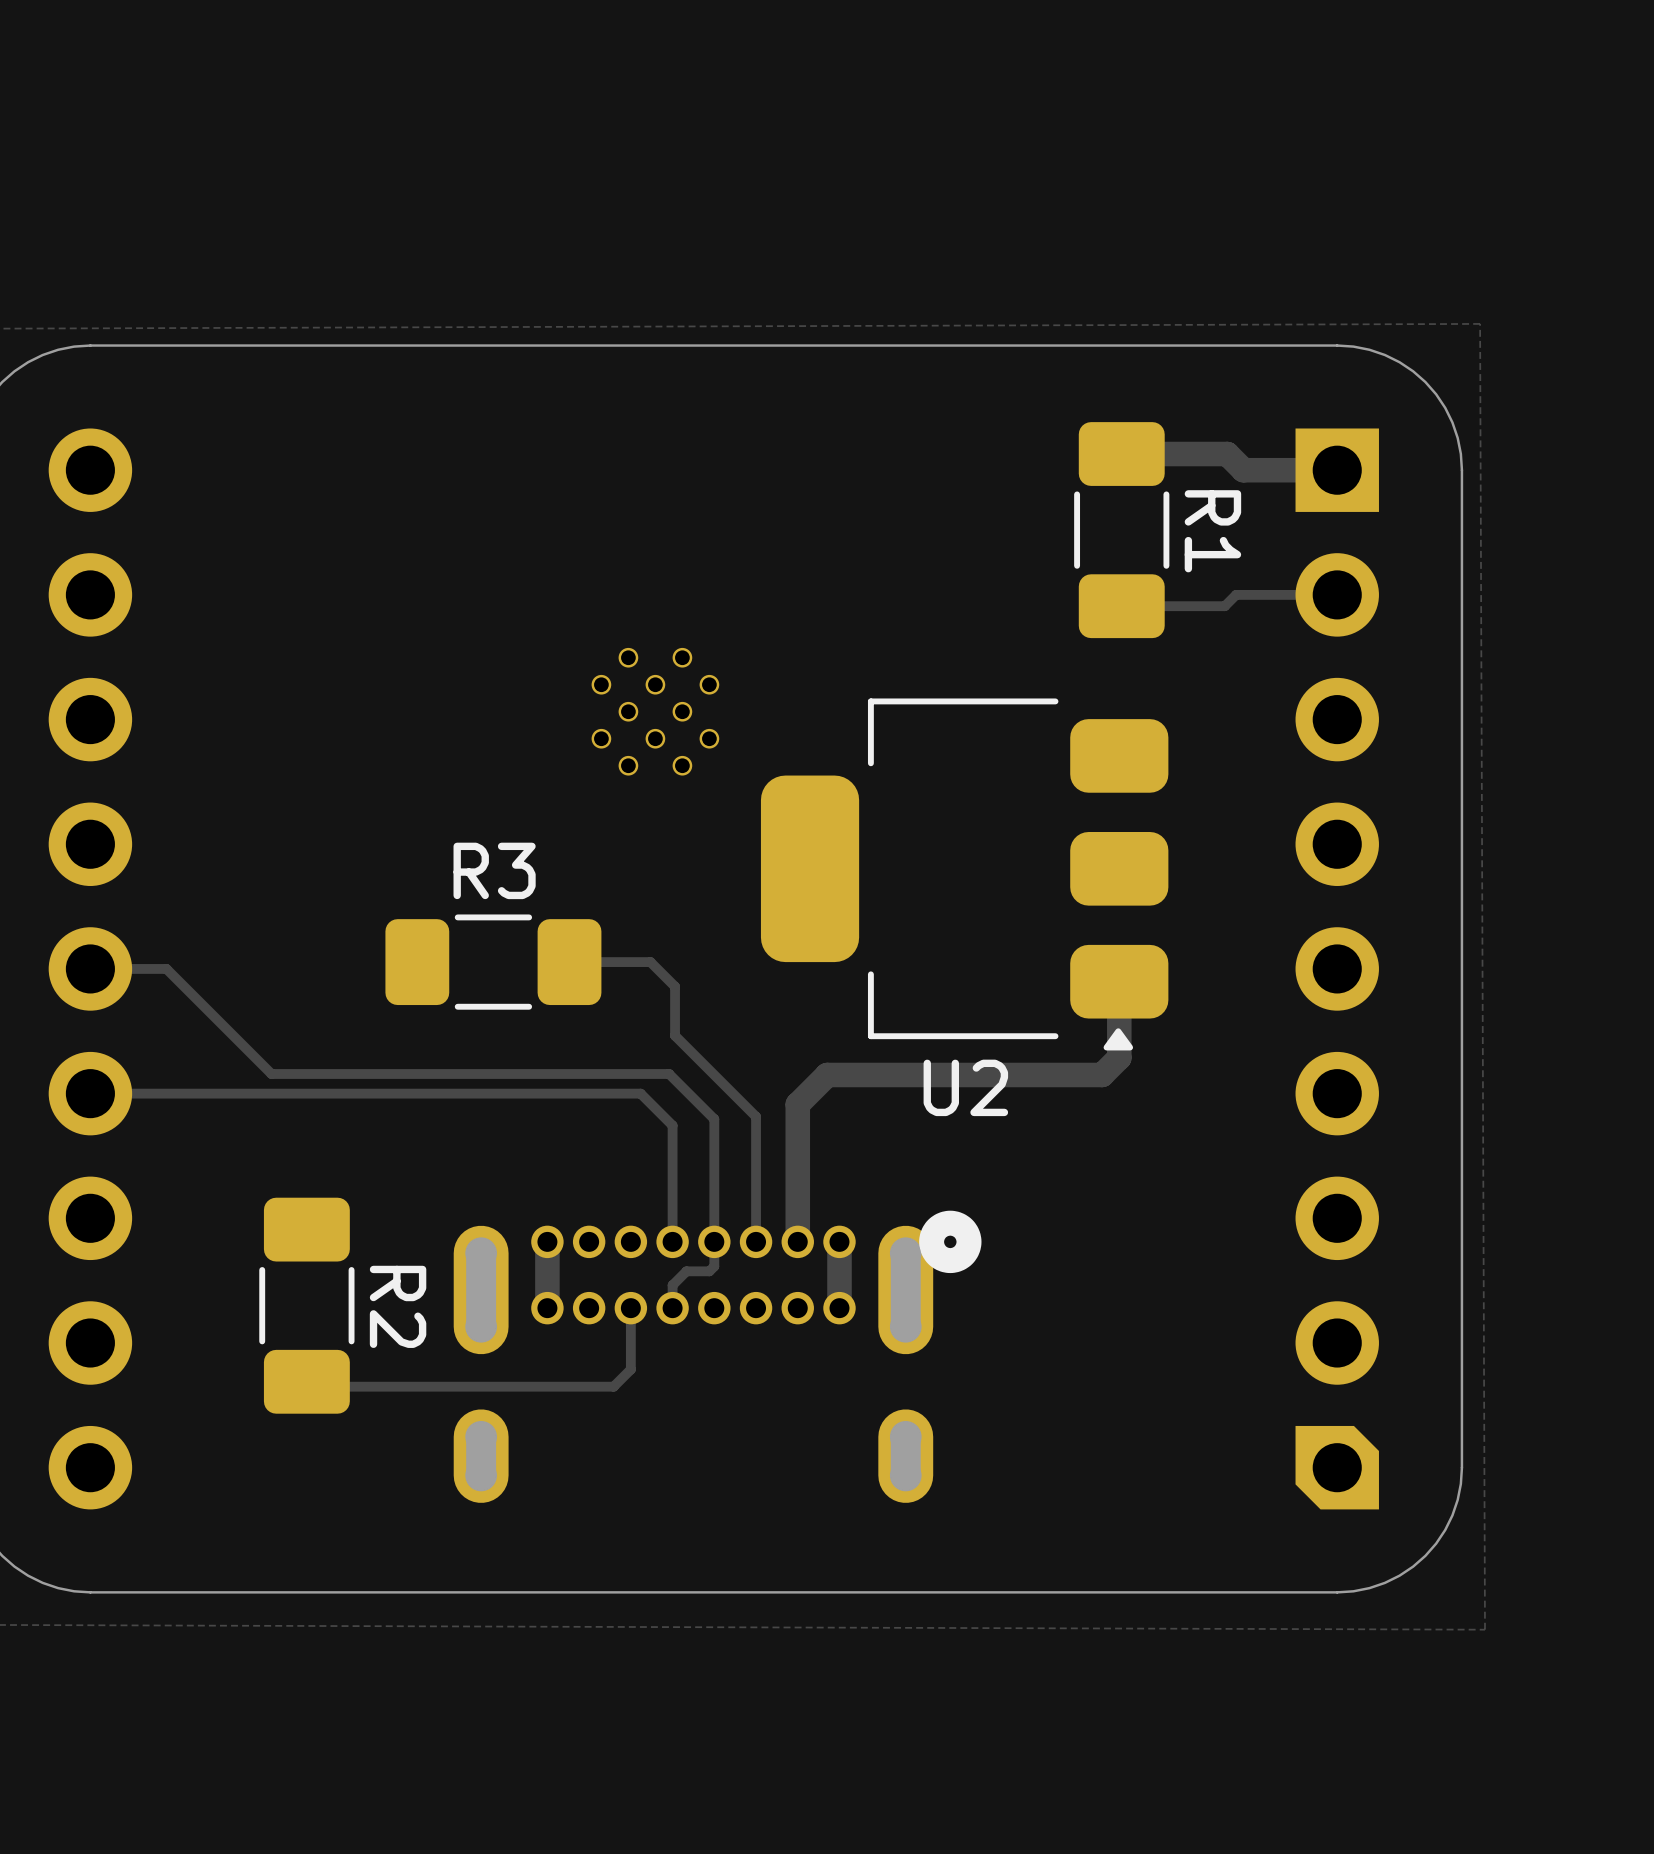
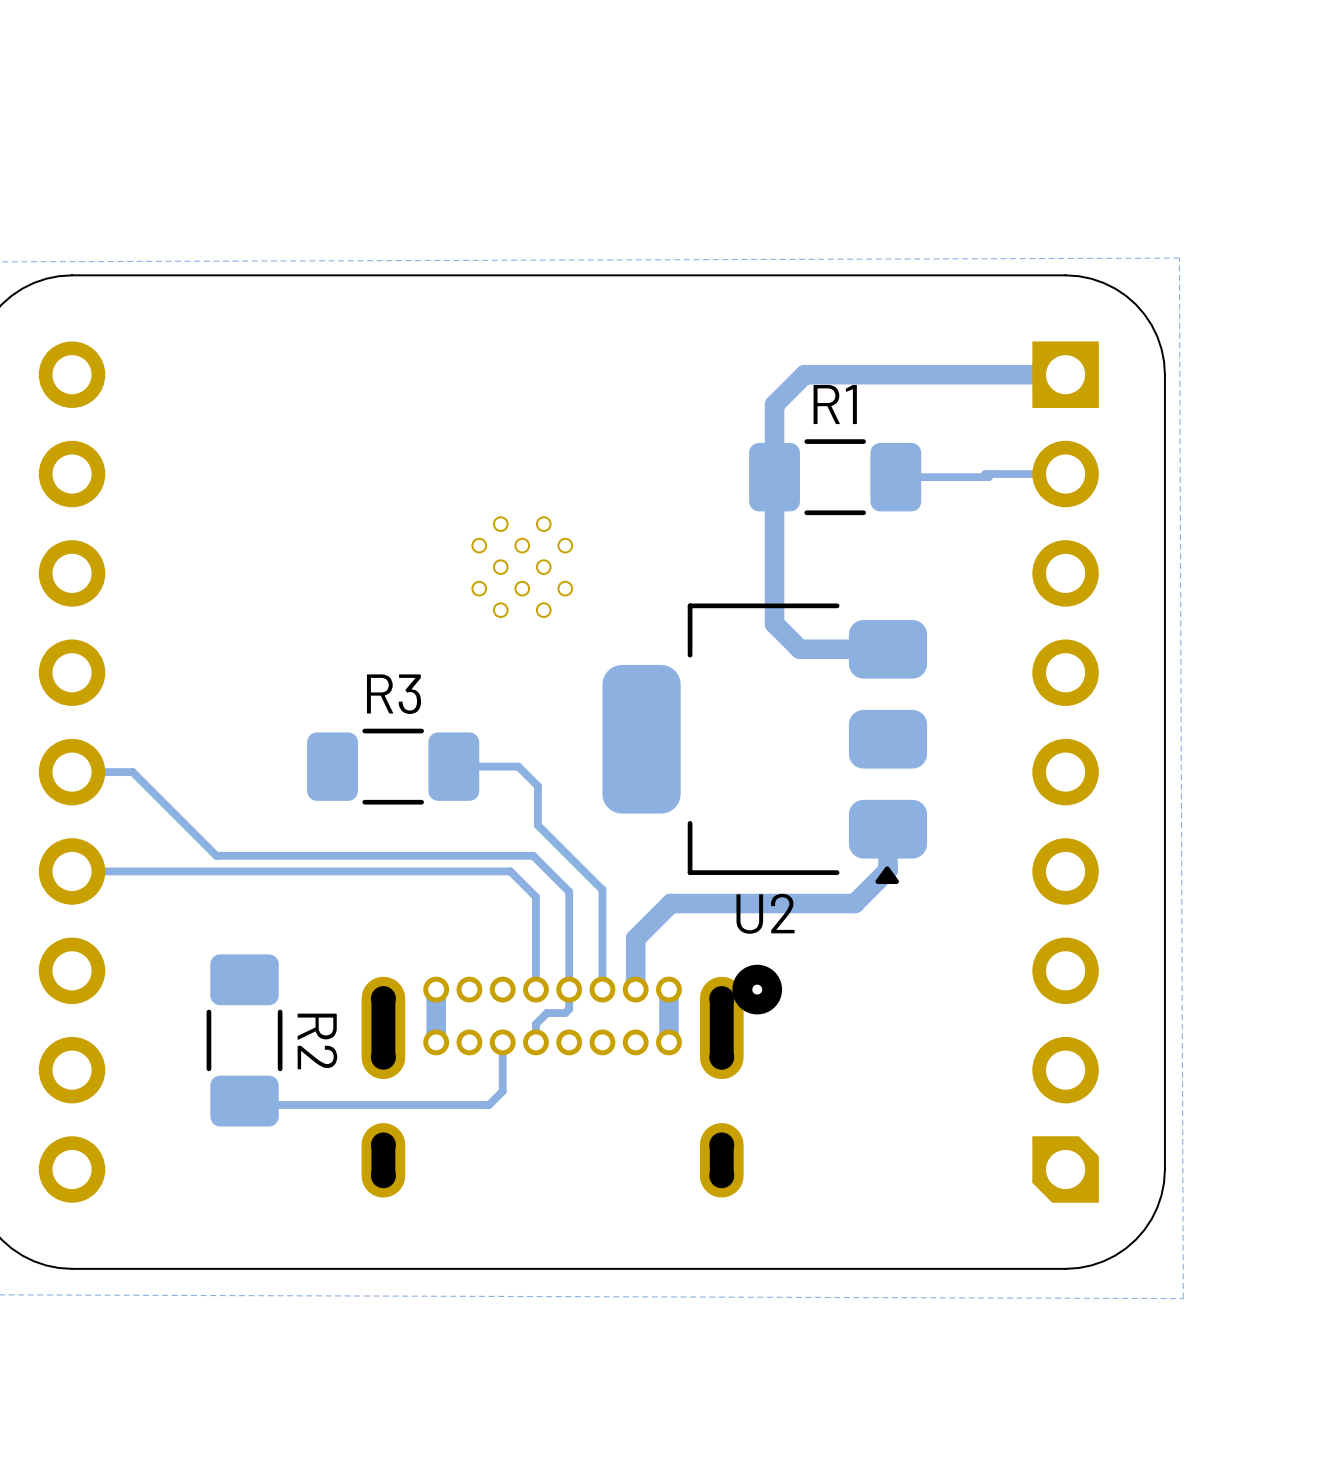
track: (1121, 454) (1227, 454) (1243, 470) -> (887, 649) (799, 649) (774, 623) (774, 404) (804, 374) (990, 374)
R1 rotation: 0° (1121, 530) -> 90° clockwise (835, 477)
R1 name position: R1 (1212, 531) -> R1 (835, 404)
track: (1236, 594) (1224, 606) (1121, 606) -> none
track: none -> (991, 474) (988, 477) (895, 477)
U2 position: (964, 874) -> (764, 743)
track: (1119, 981) (1119, 1057) (1102, 1074) (827, 1074) (797, 1104) (797, 1178) -> (887, 829) (887, 870) (854, 903) (670, 903) (635, 938)

